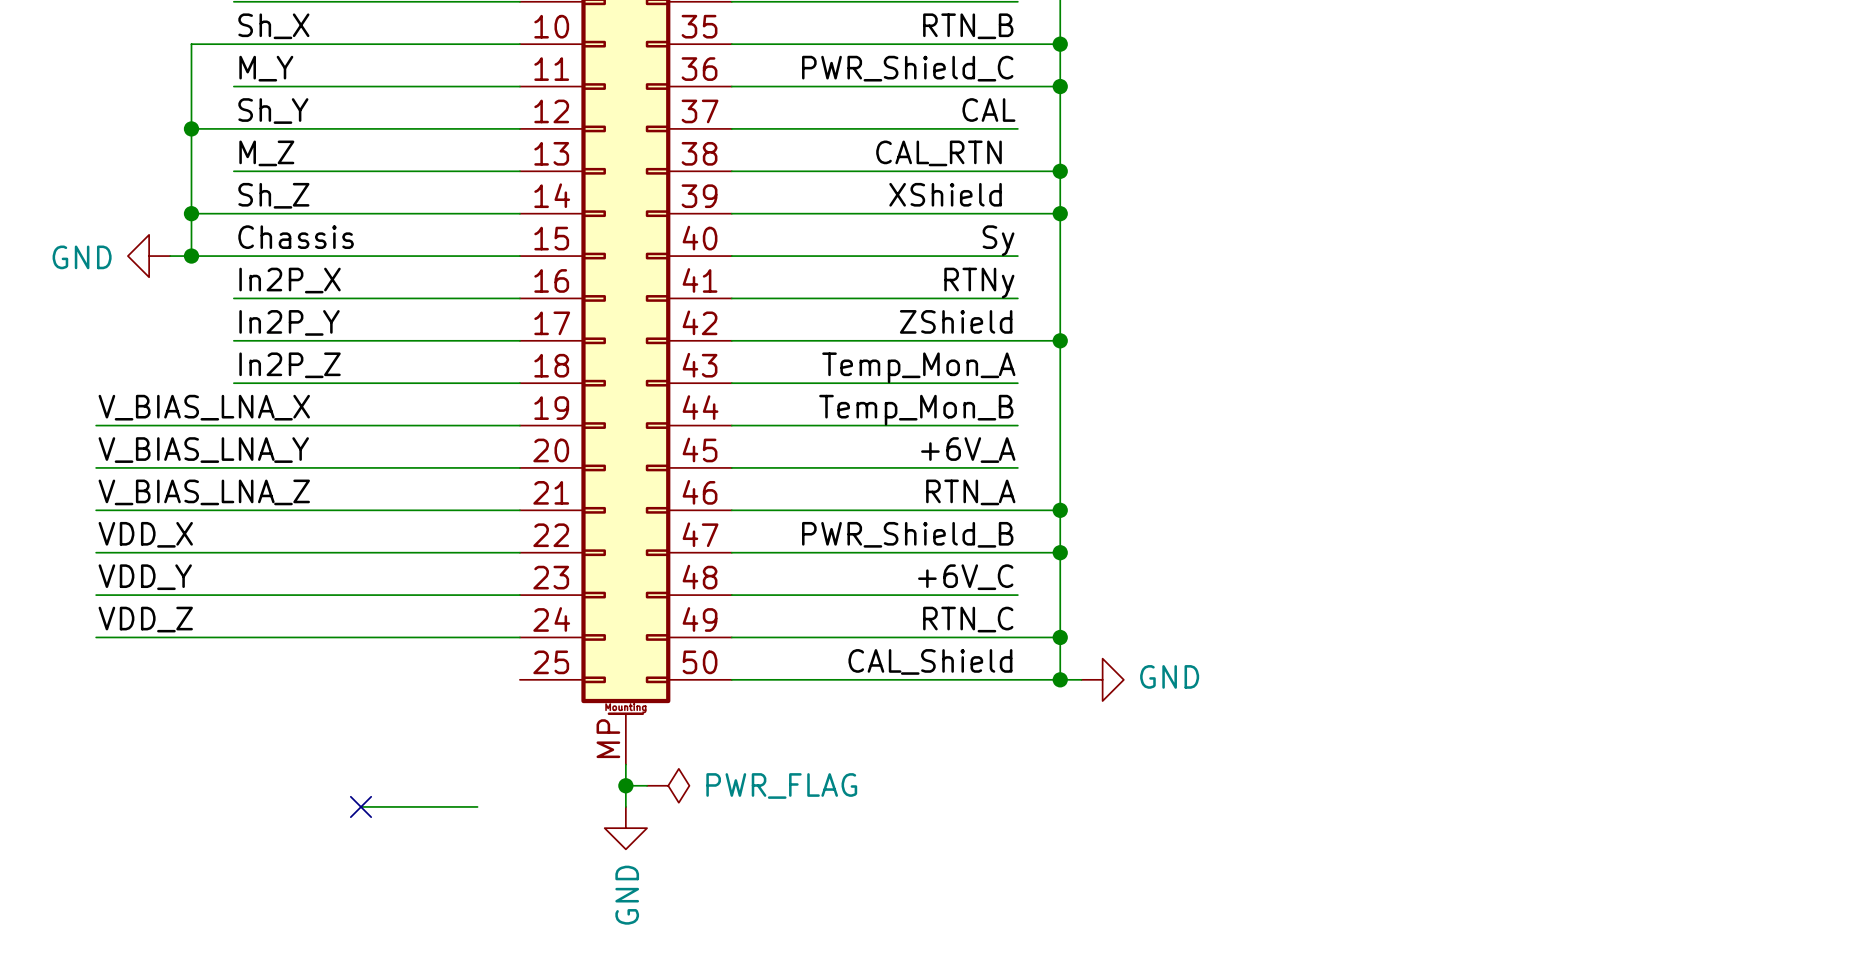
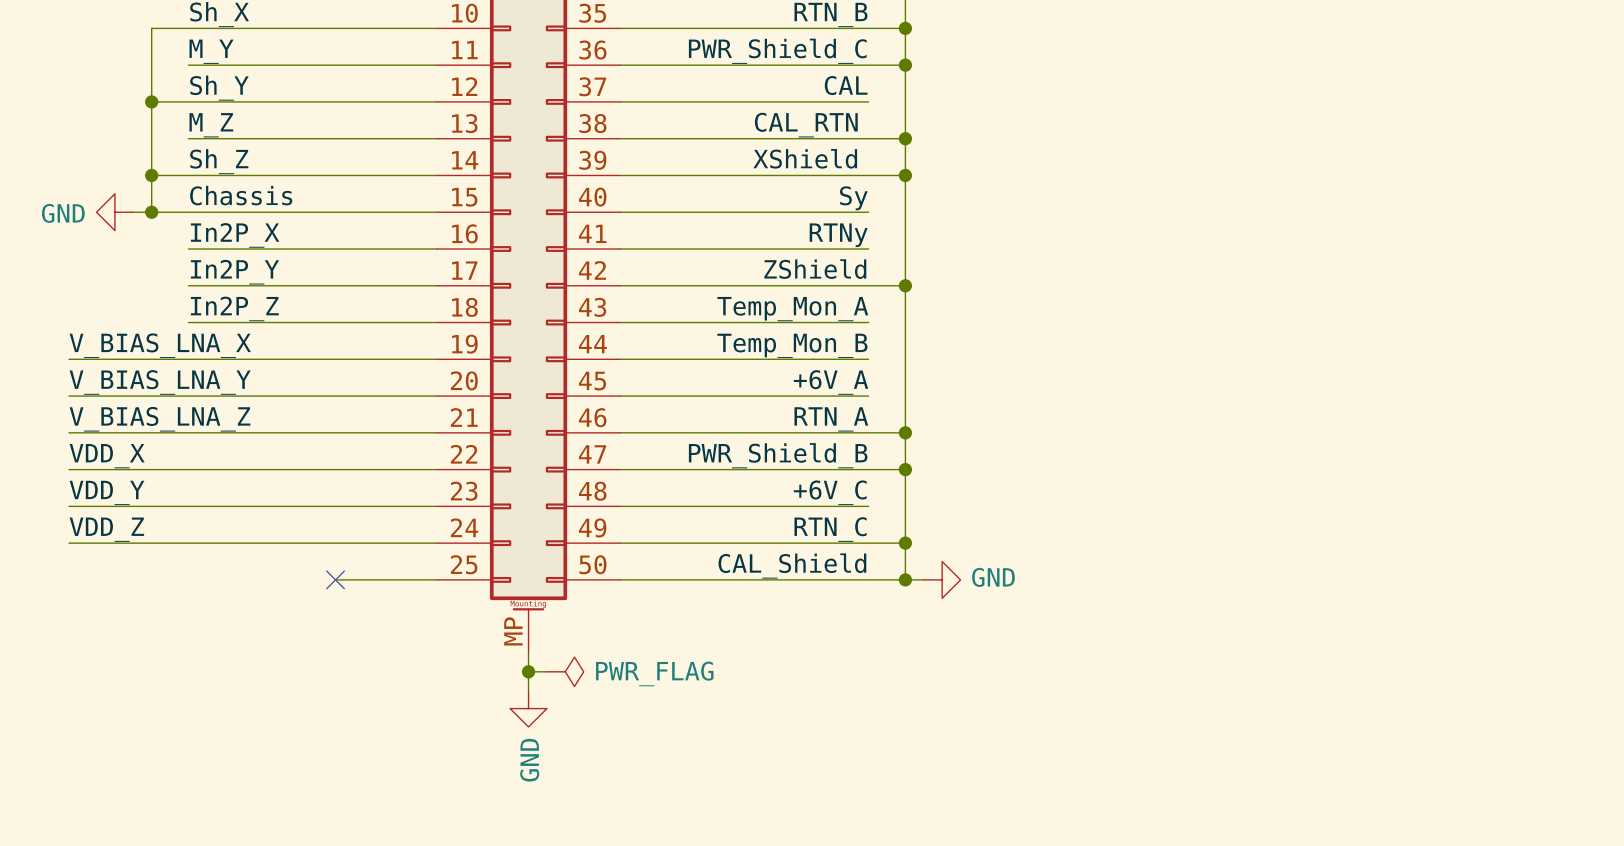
no-connect mark: none -> (335, 579)
wire: (361, 806) (477, 806) -> (335, 579) (436, 579)
no-connect mark: (361, 806) -> none

